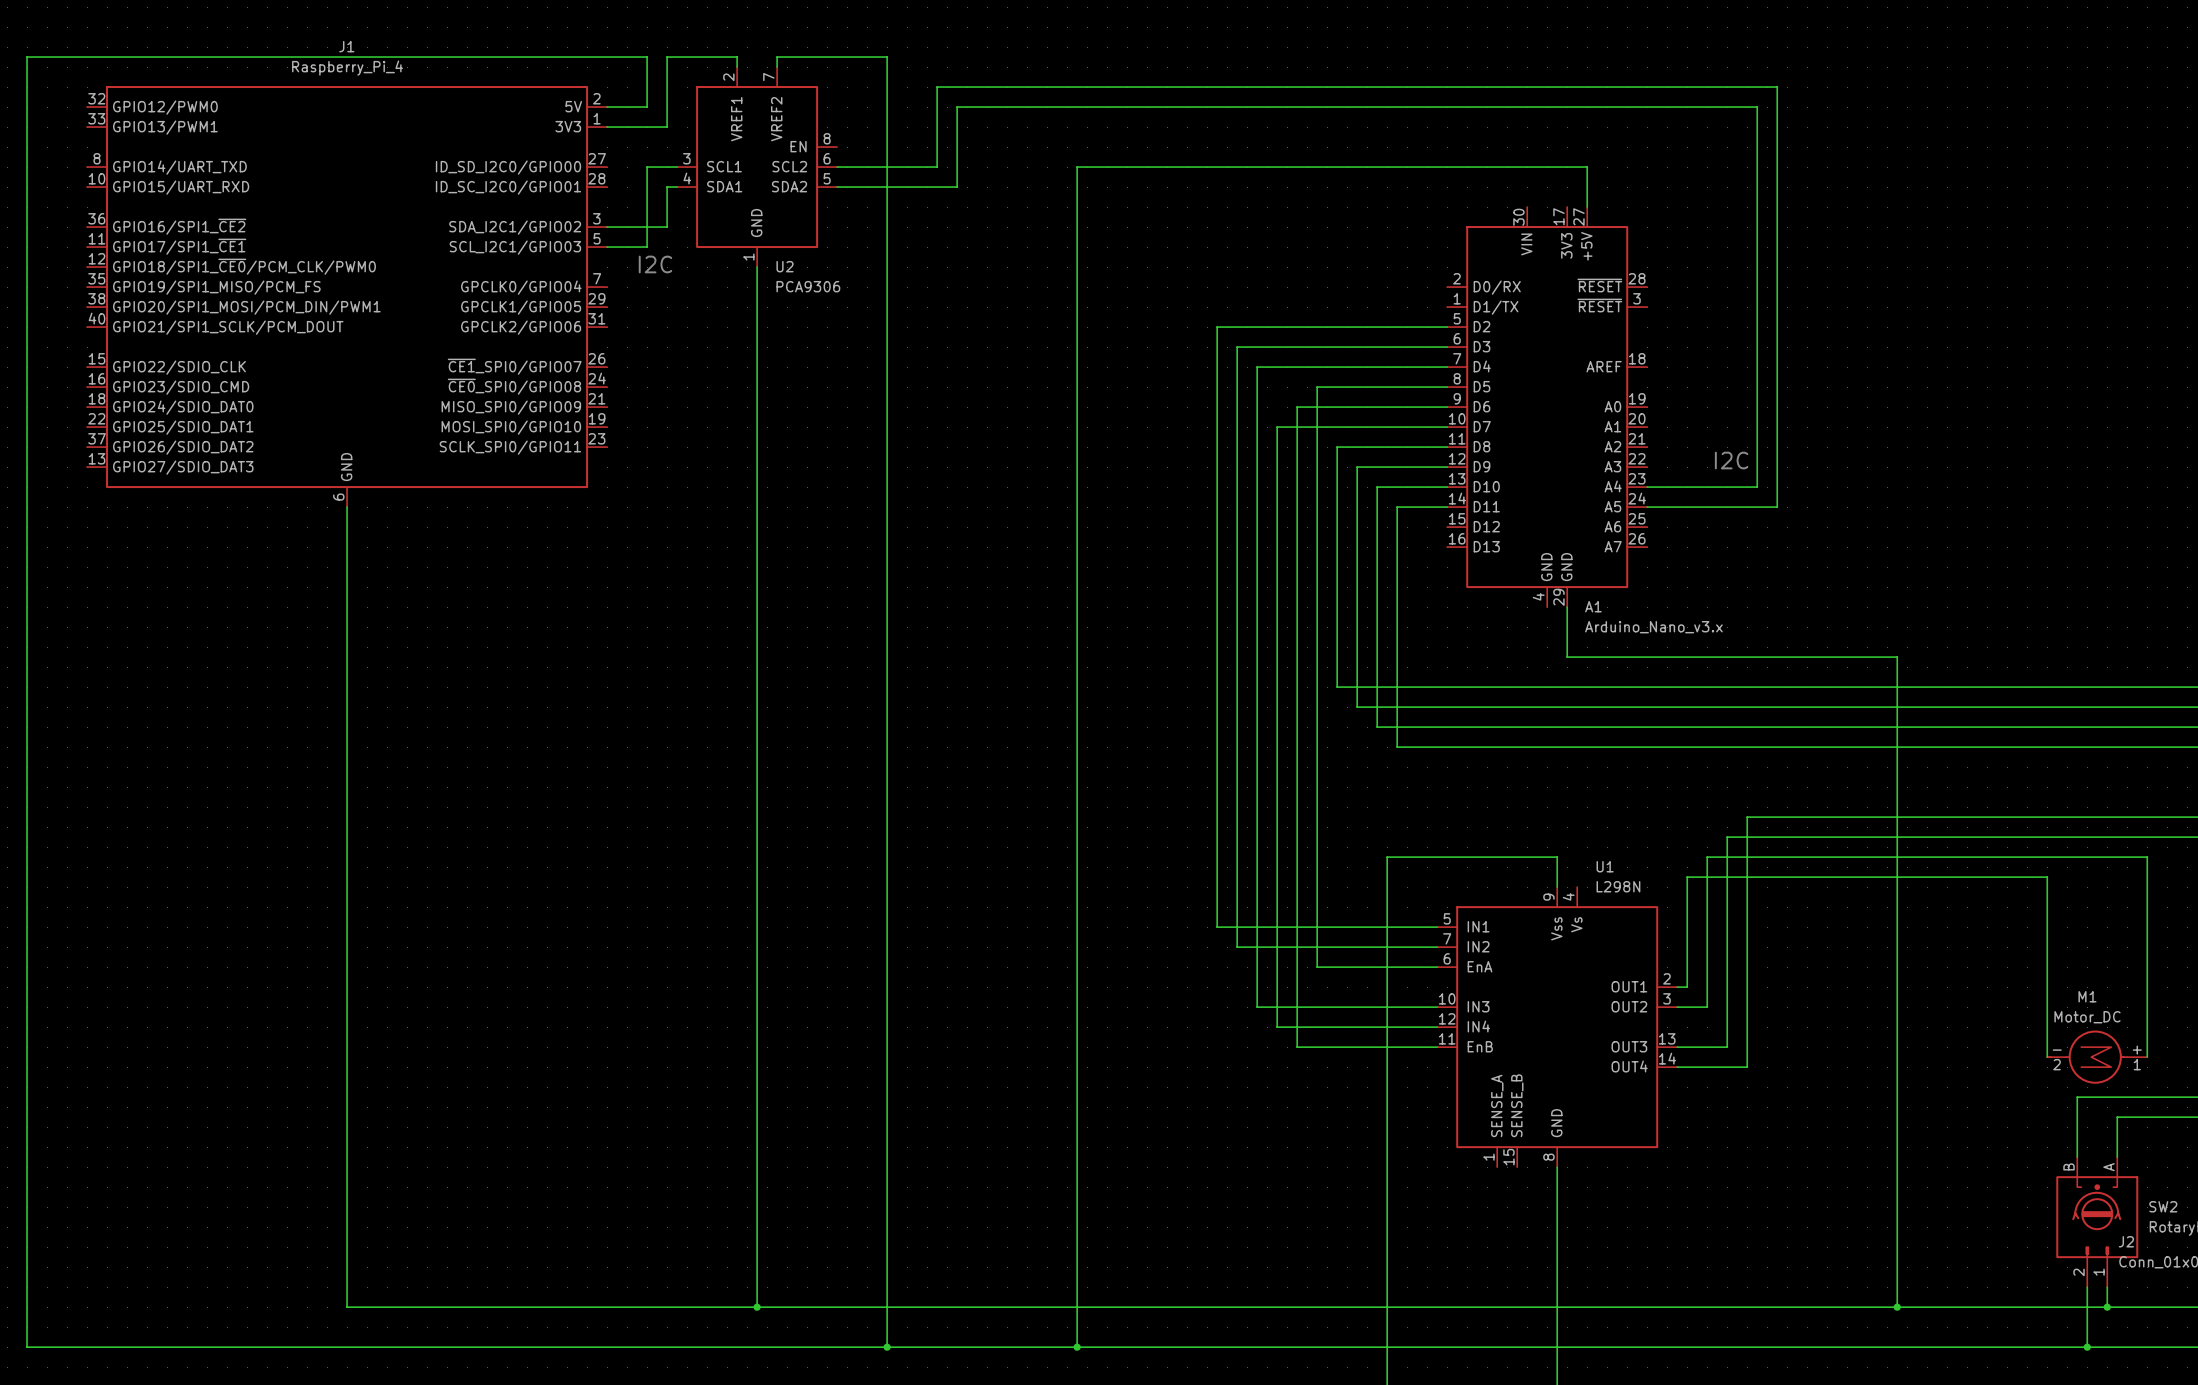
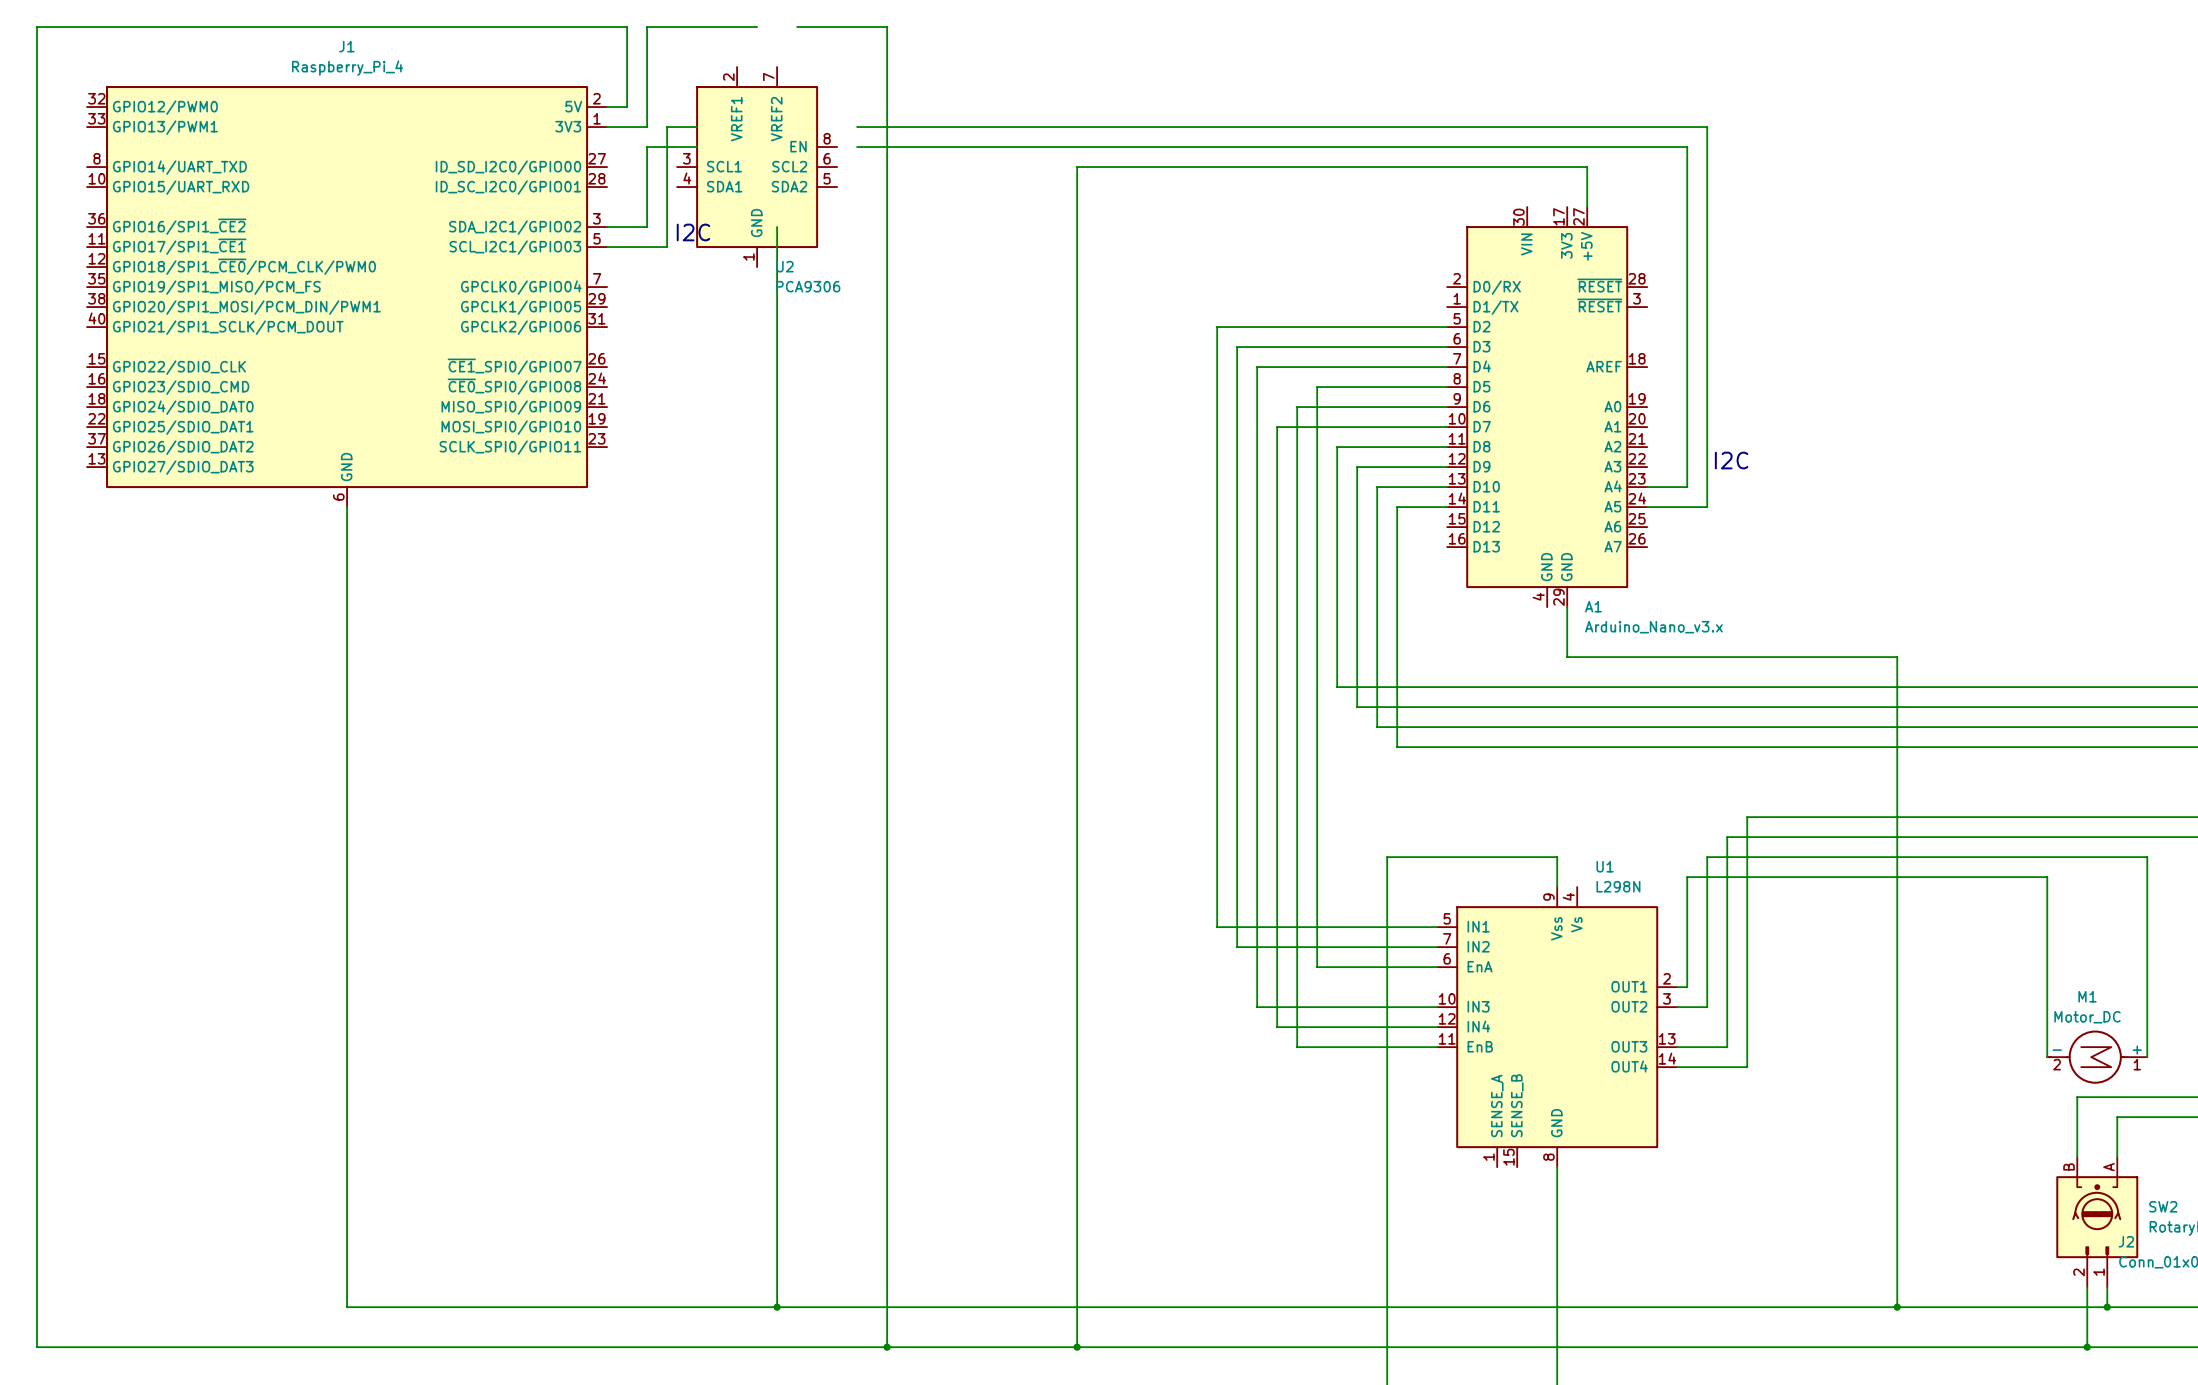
wire: none -> (757, 27) (647, 27) (647, 57)
wire: (647, 57) (27, 57) (27, 1347) (37, 1347) -> (627, 107) (627, 27) (37, 27) (37, 1347)
wire: (887, 57) (777, 57) (777, 67) -> (887, 57) (887, 27) (797, 27)
wire: (737, 67) (737, 57) (667, 57) (667, 127) (647, 127) -> none
wire: (627, 107) (647, 107) -> (647, 127) (647, 107)
wire: (647, 167) (677, 167) -> (647, 167) (647, 147) (697, 147)
wire: (837, 167) (937, 167) (937, 87) (1777, 87) (1777, 507) (1707, 507) -> (857, 127) (1707, 127) (1707, 507)
wire: (667, 187) (677, 187) -> (667, 187) (667, 127) (697, 127)
wire: (837, 187) (957, 187) (957, 107) (1757, 107) (1757, 487) (1687, 487) -> (857, 147) (1687, 147) (1687, 487)
wire: (667, 227) (647, 227) (647, 247) -> (667, 227) (667, 247) (647, 247)
wire: none -> (777, 227) (777, 1307)
text position: I2C (655, 264) -> I2C (693, 232)
wire: (757, 267) (757, 1307) -> none
junction position: (757, 1307) -> (777, 1307)

